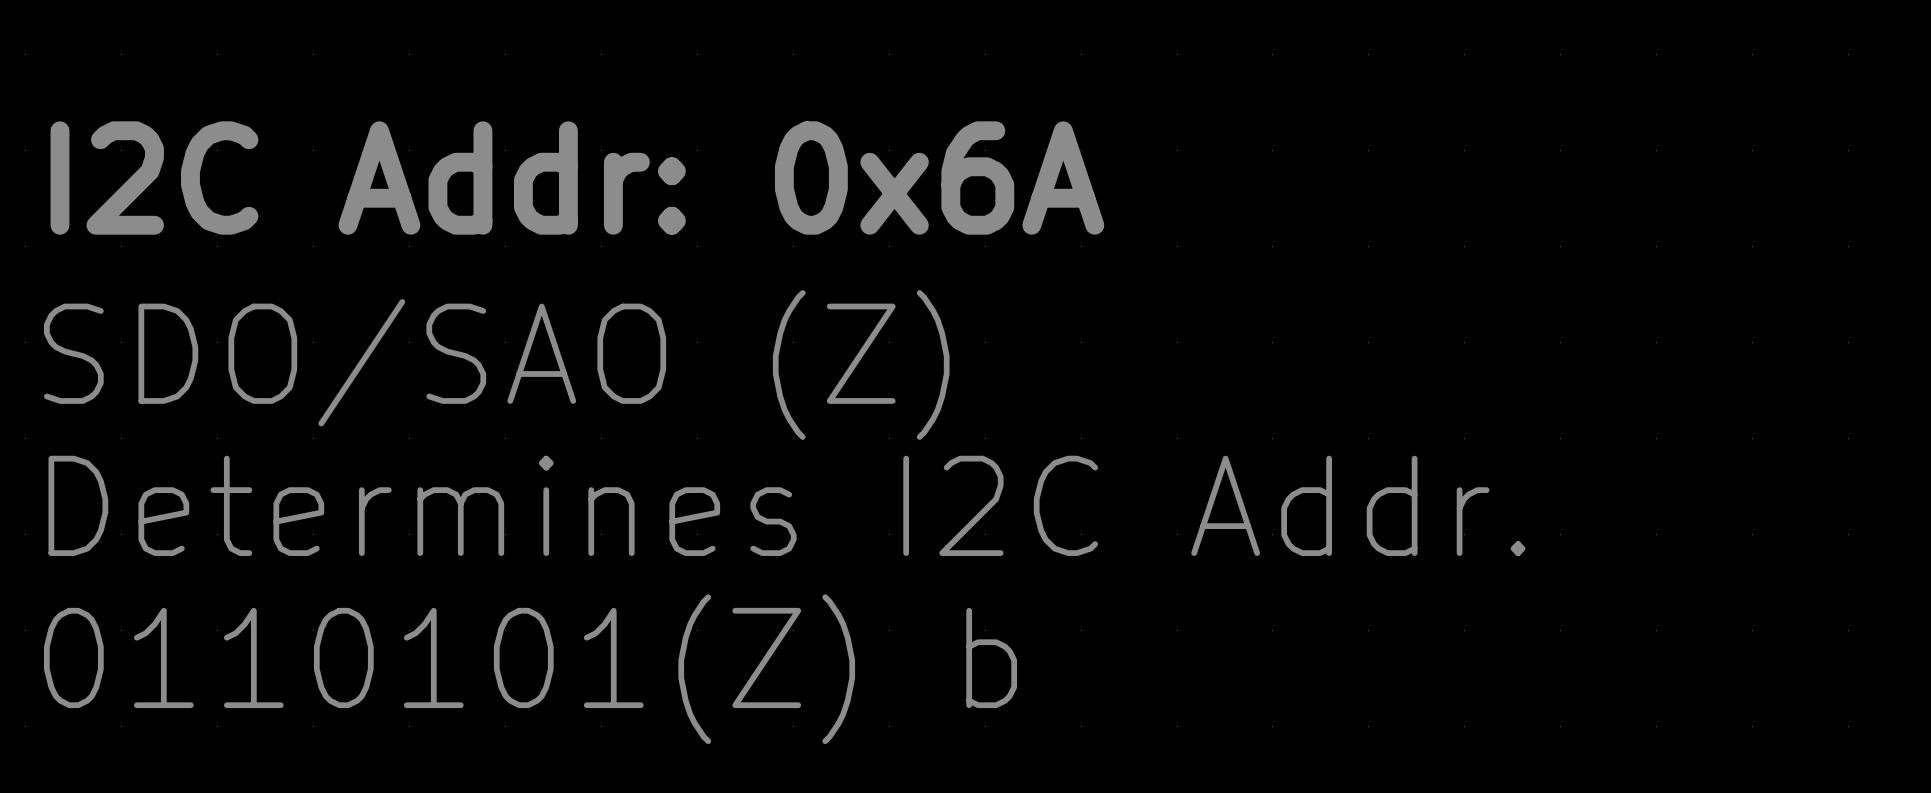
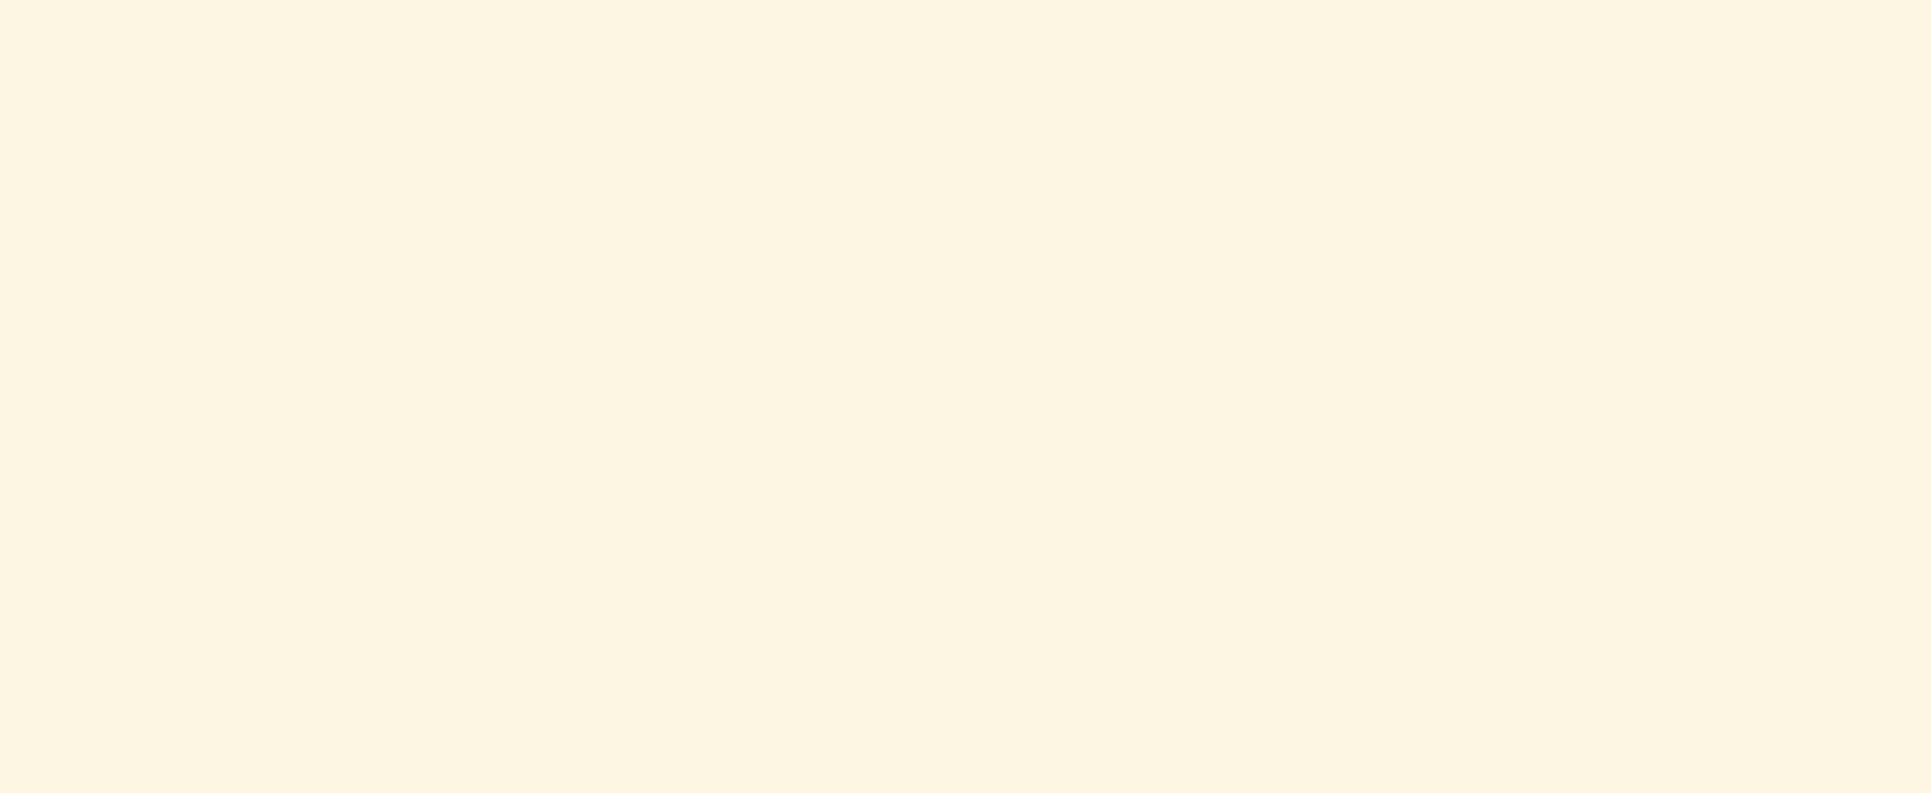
text: I2C Addr: 0x6A (577, 178) -> none
text: SDO/SAO (Z) (496, 364) -> none
text: Determines I2C Addr. (786, 505) -> none
text: 0110101(Z) b (530, 669) -> none

